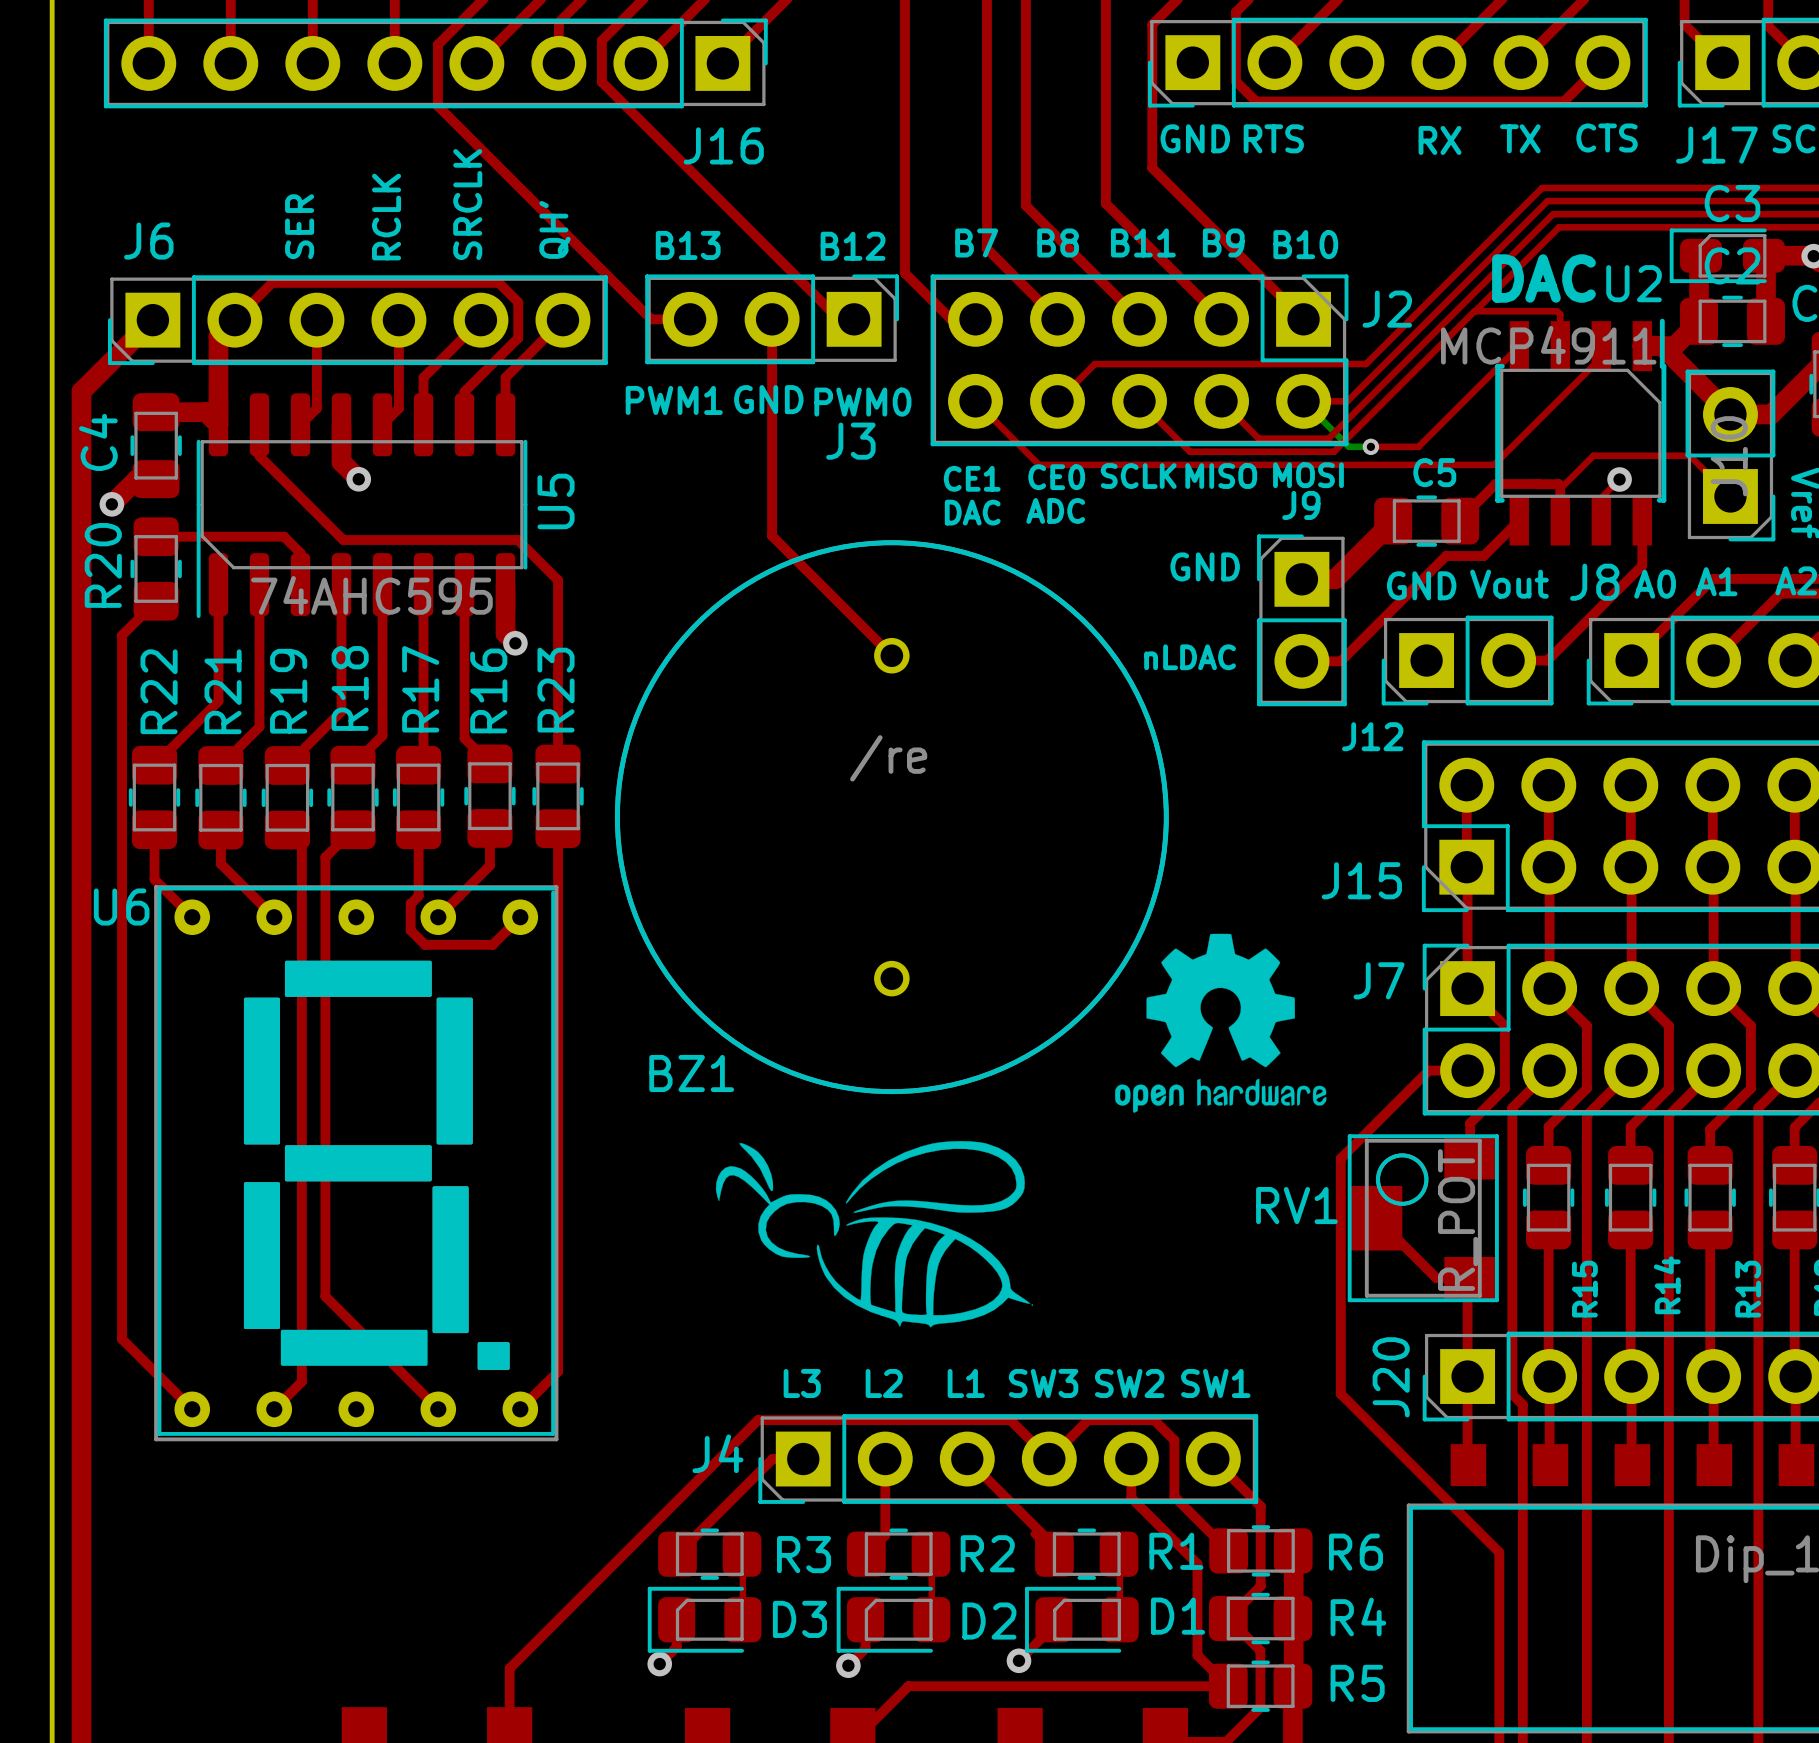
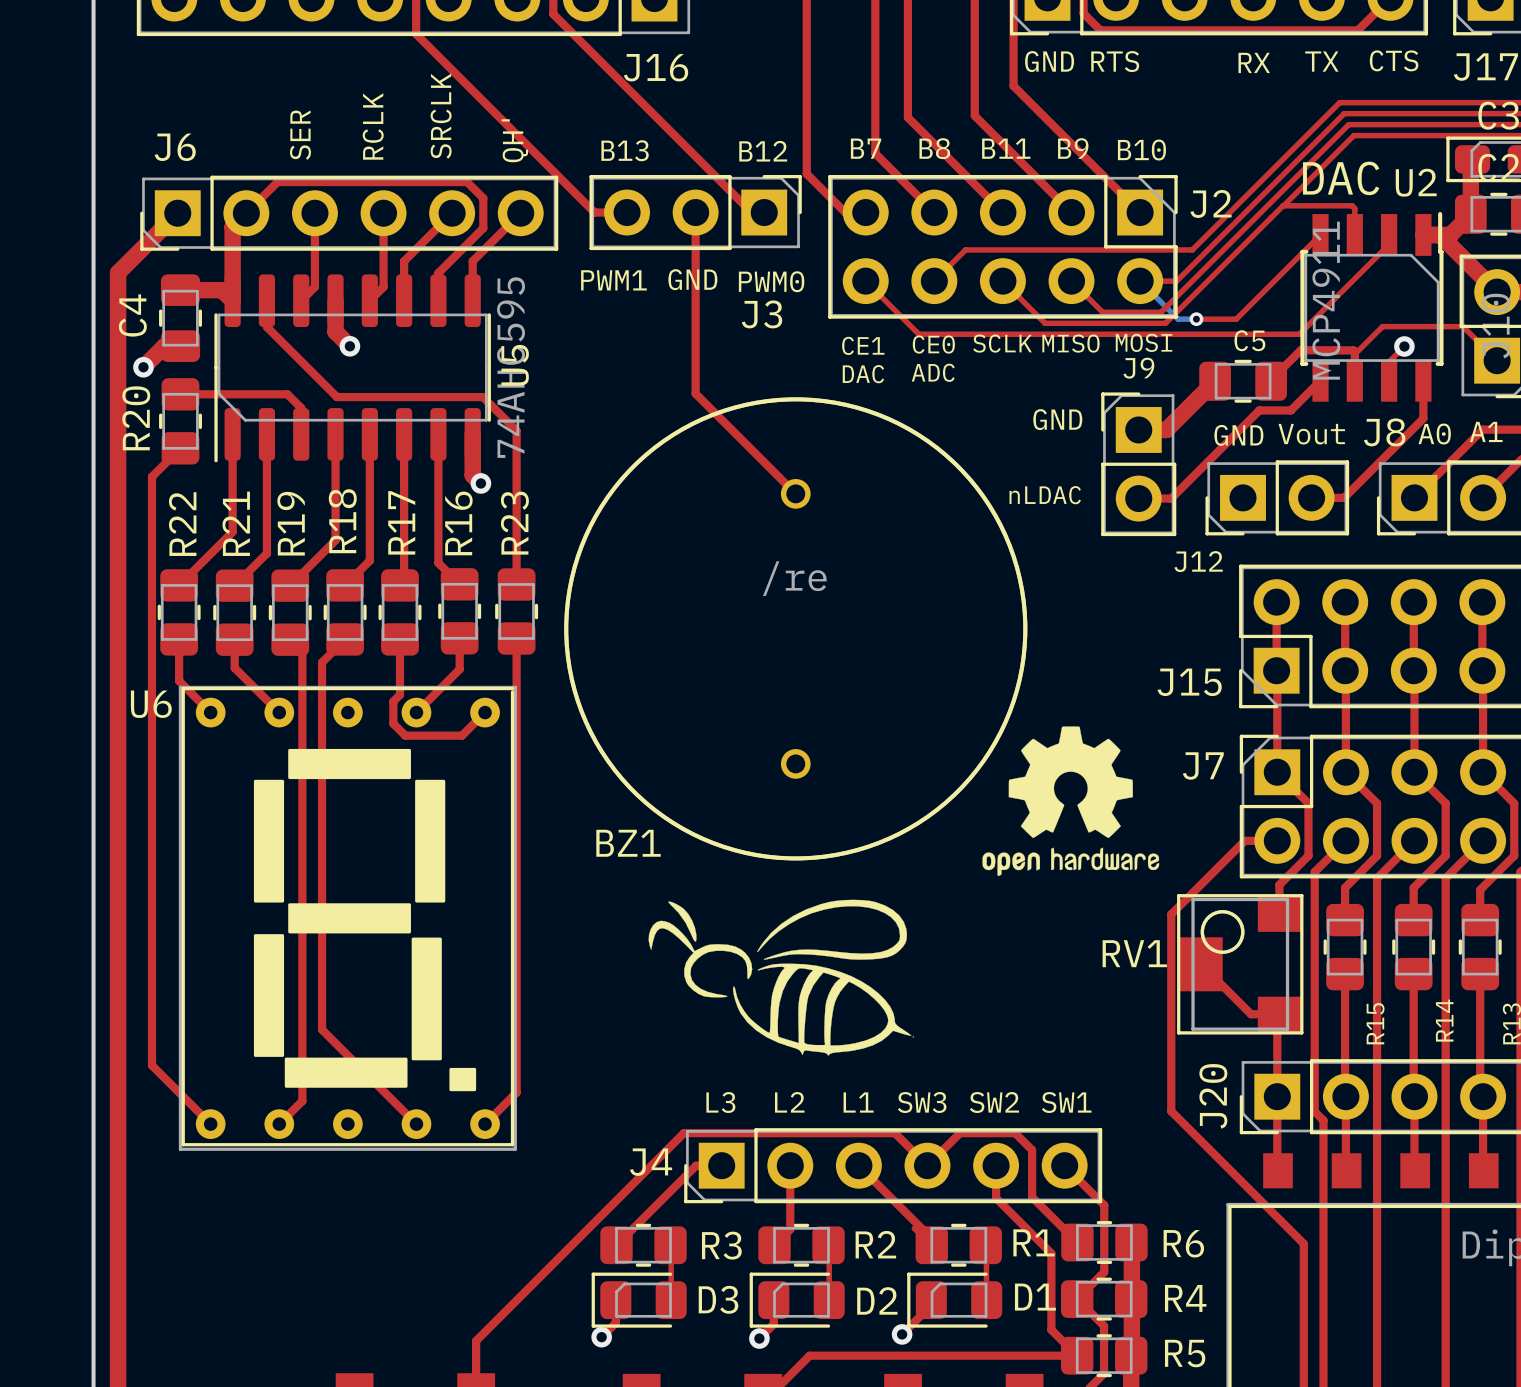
U2 value rotation: 0° (1548, 345) -> 90° counterclockwise (1326, 300)
U5 value rotation: 0° (371, 595) -> 90° counterclockwise (511, 367)
U6 footprint: [154, 885, 559, 1442] -> [178, 685, 517, 1151]
RV1 value: R_POT (1458, 1220) -> none

